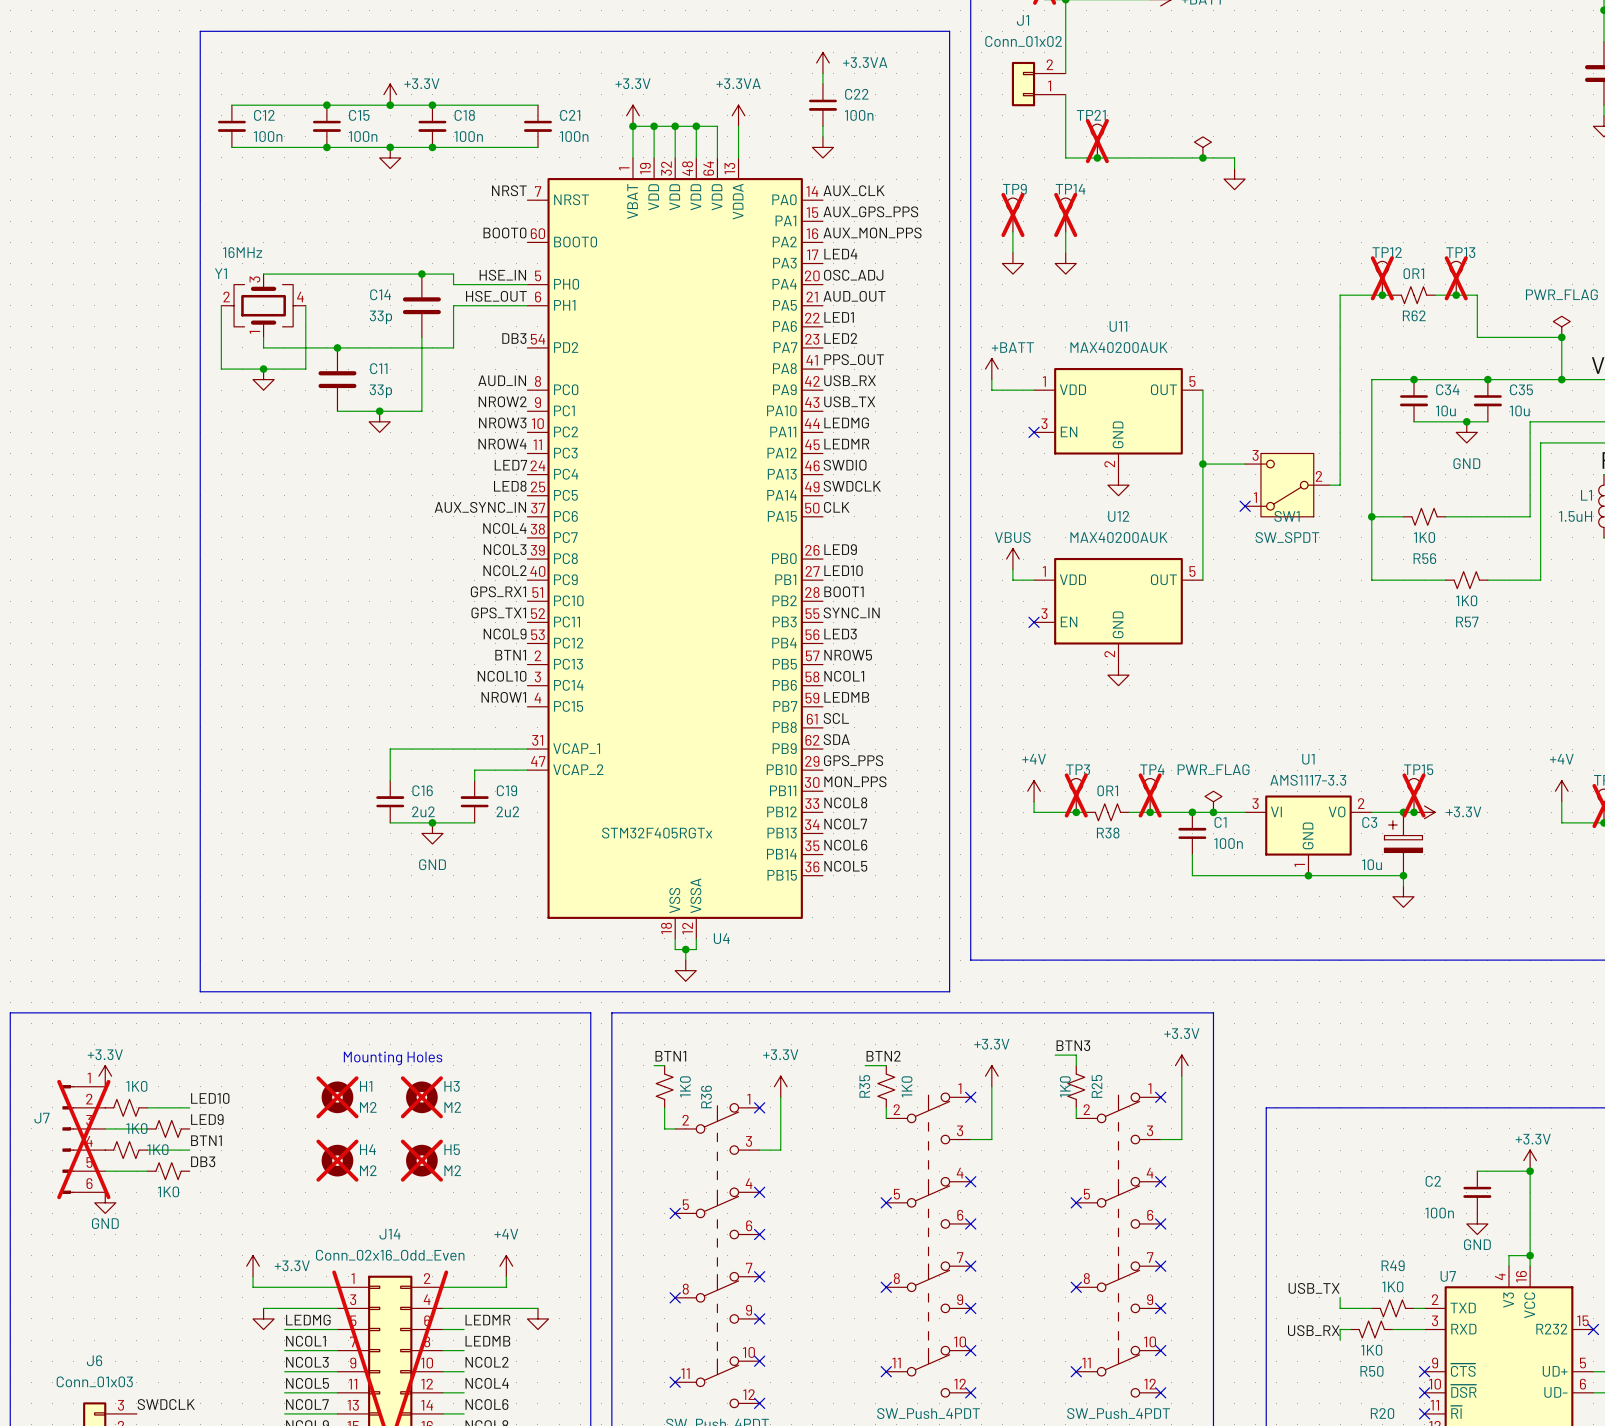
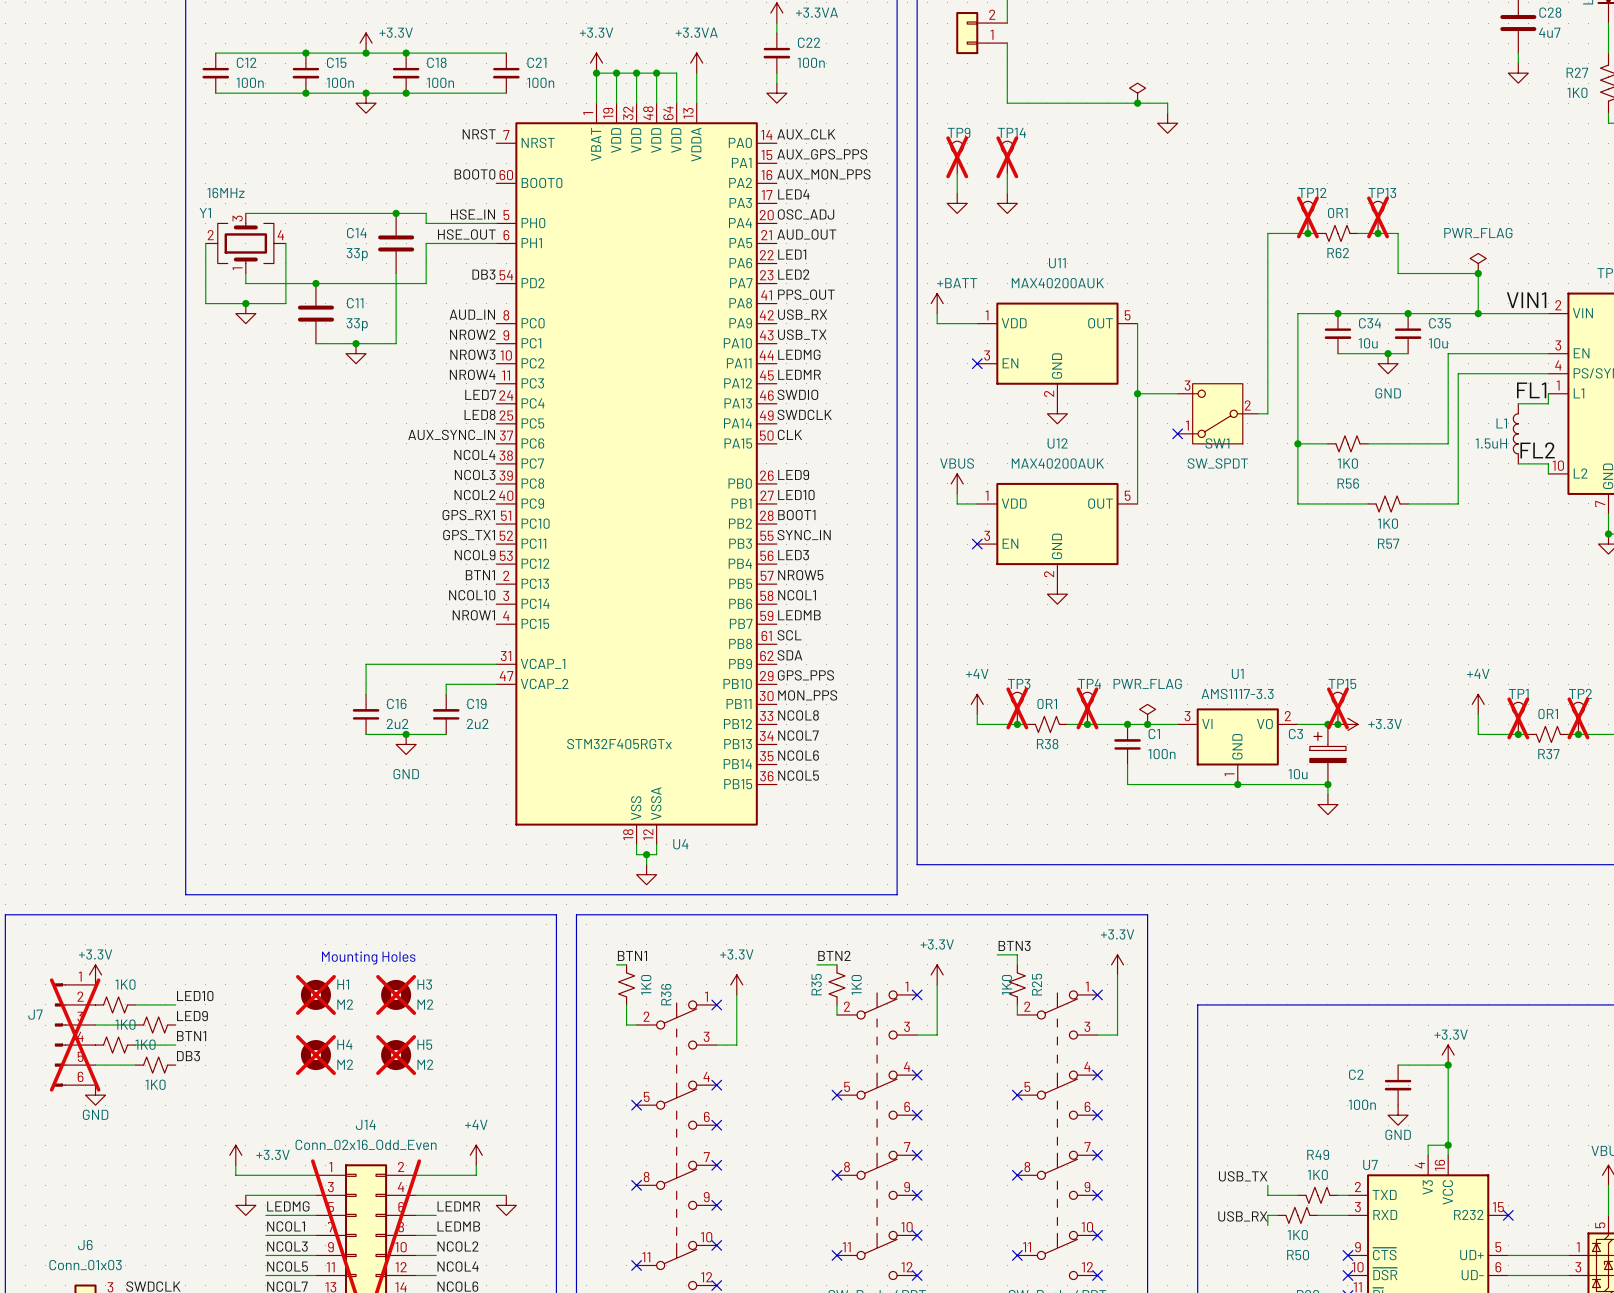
TP21: (1097, 141) -> none
junction: (1097, 157) -> none

